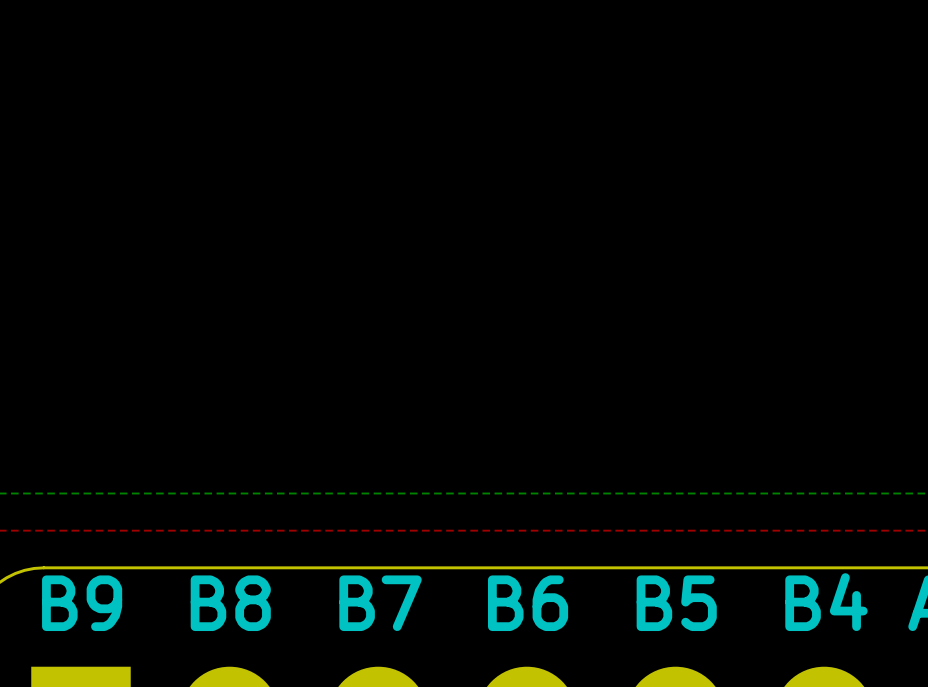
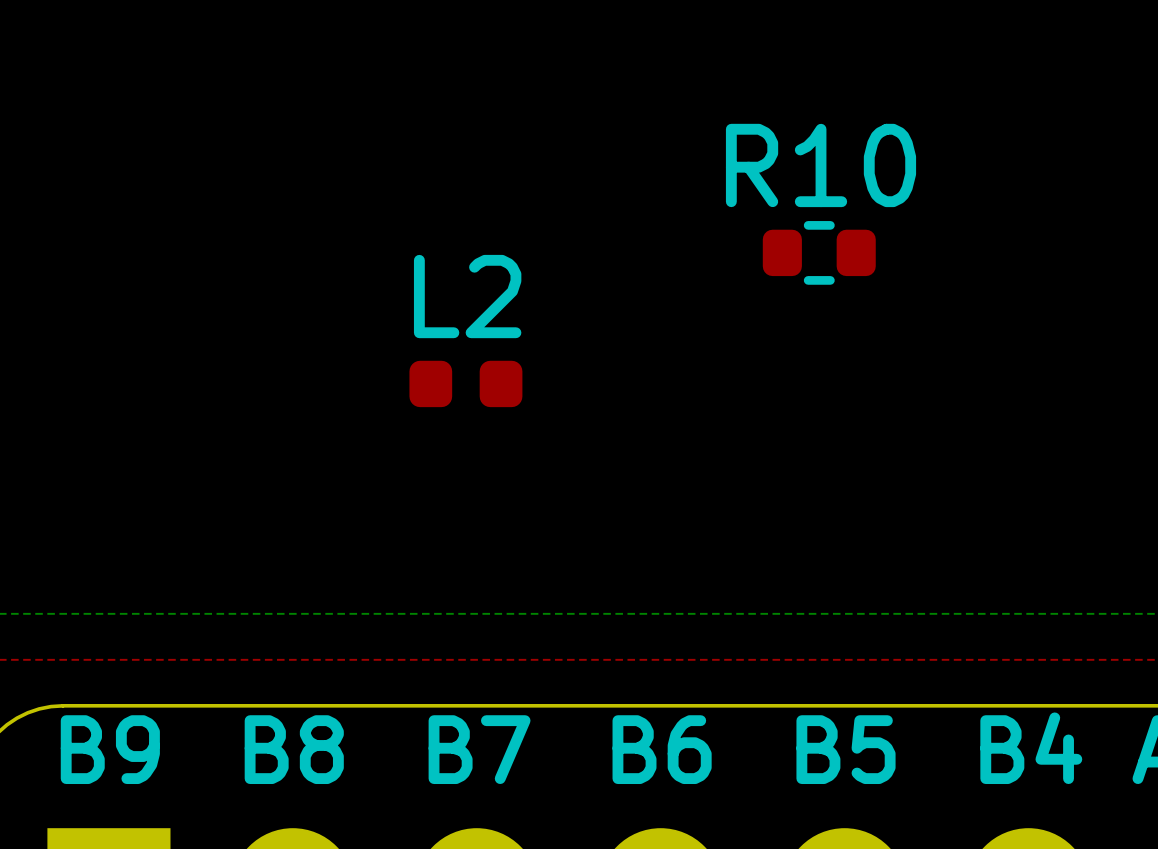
R10: none -> (819, 252)
L2: none -> (465, 383)

